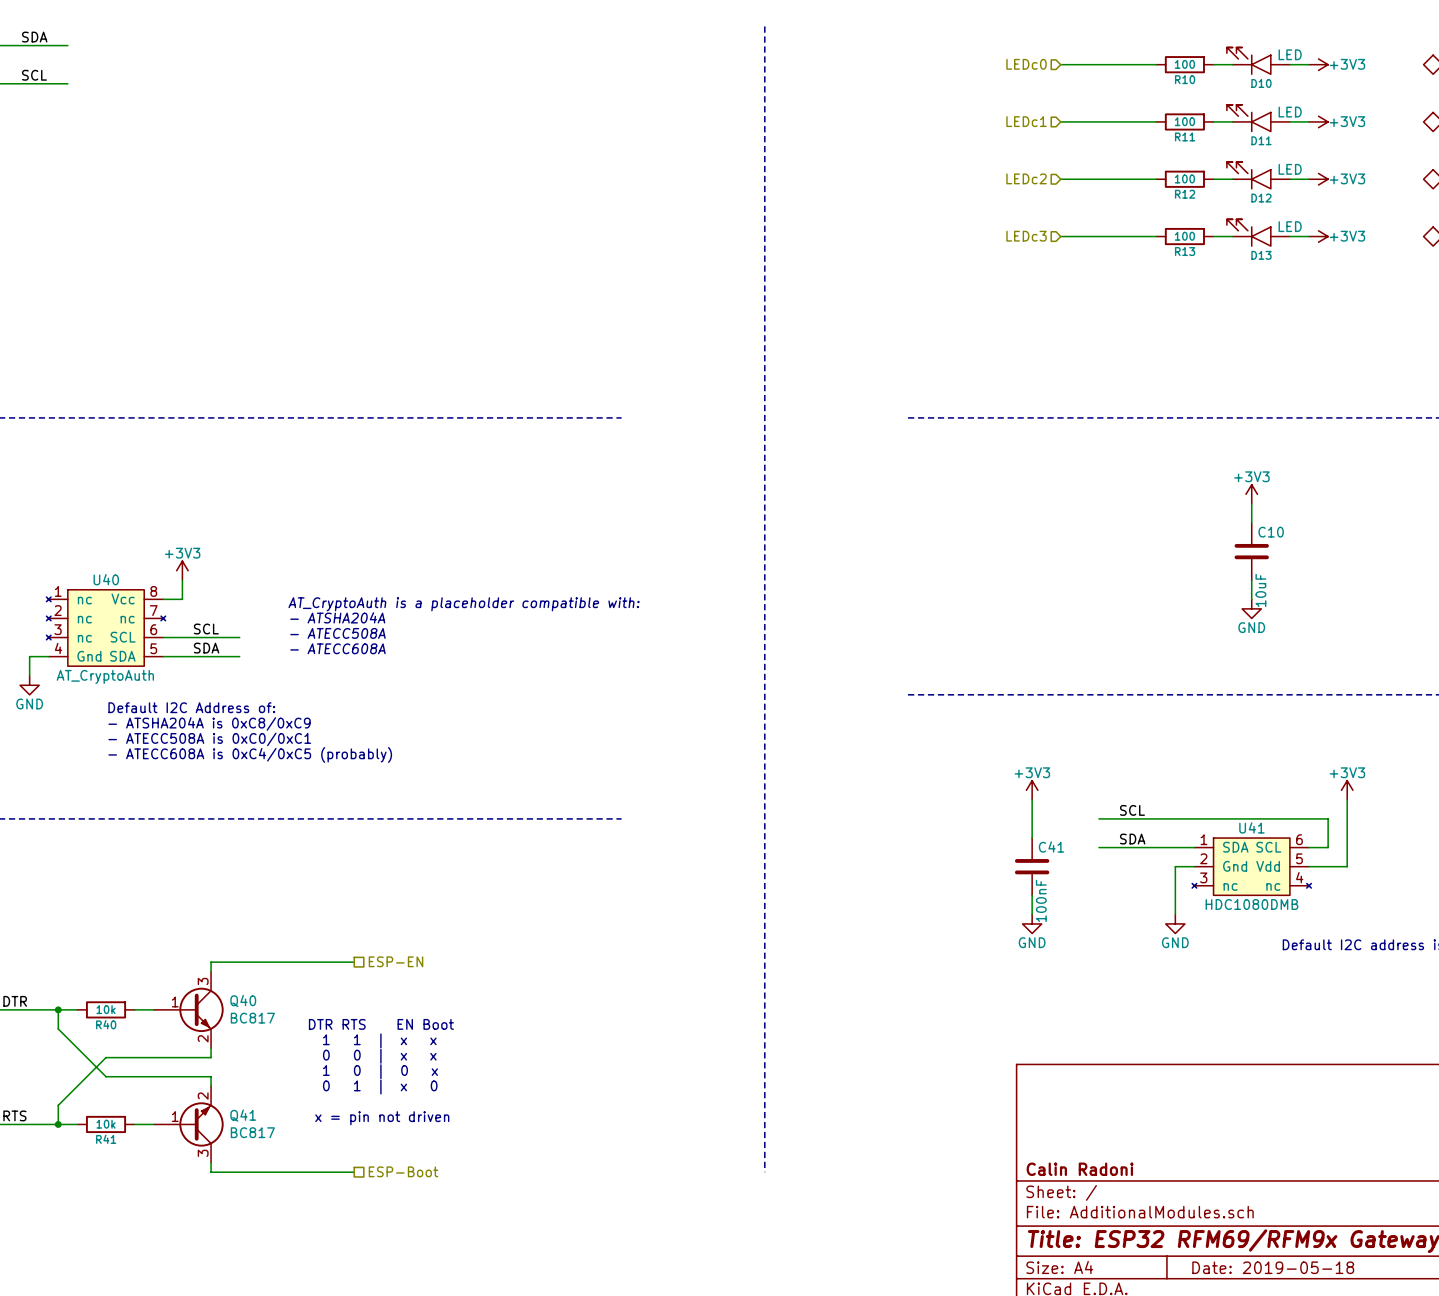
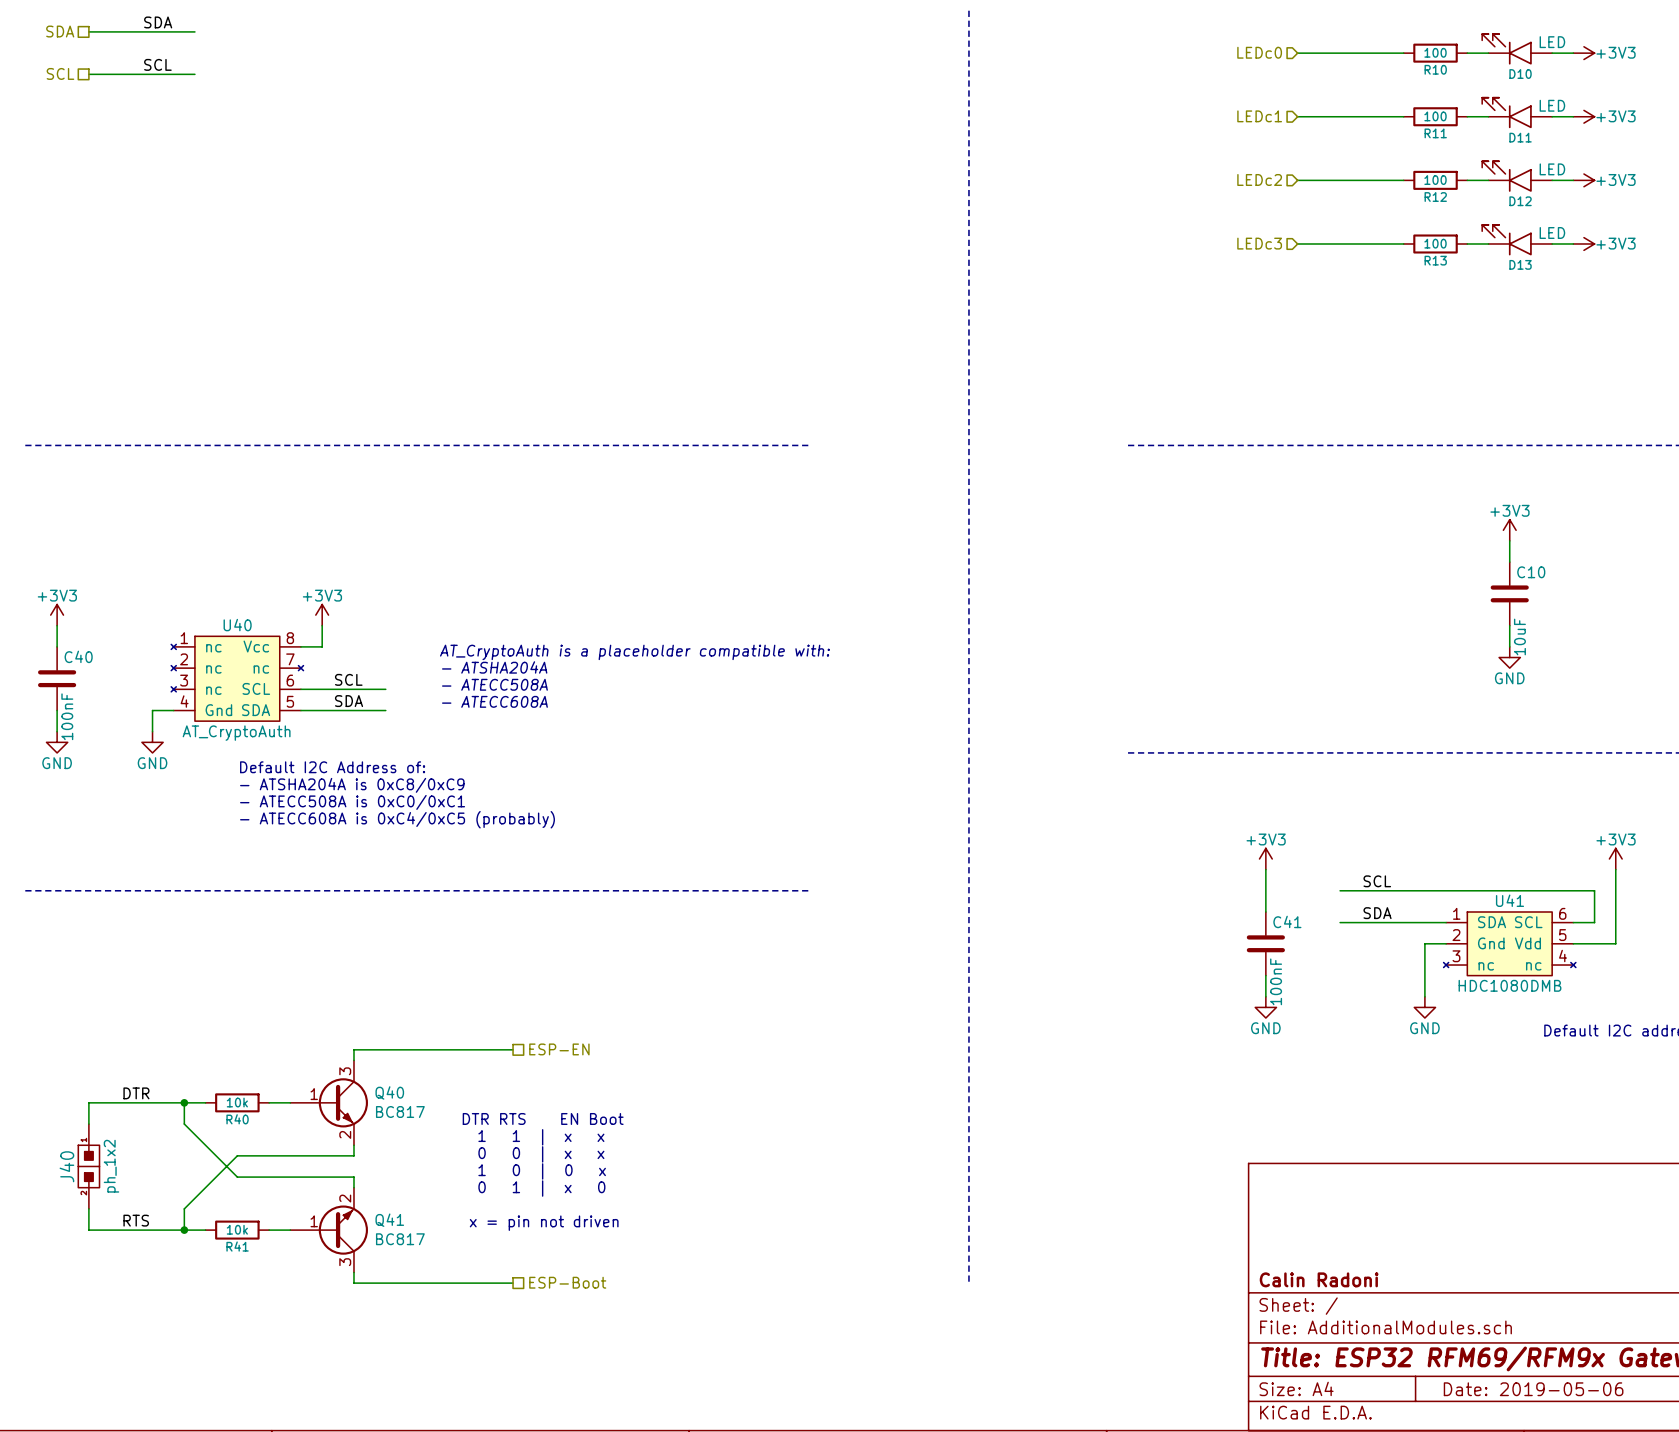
title block: Date: 2019-05-18 (1273, 1267) -> Date: 2019-05-06 (1533, 1389)

